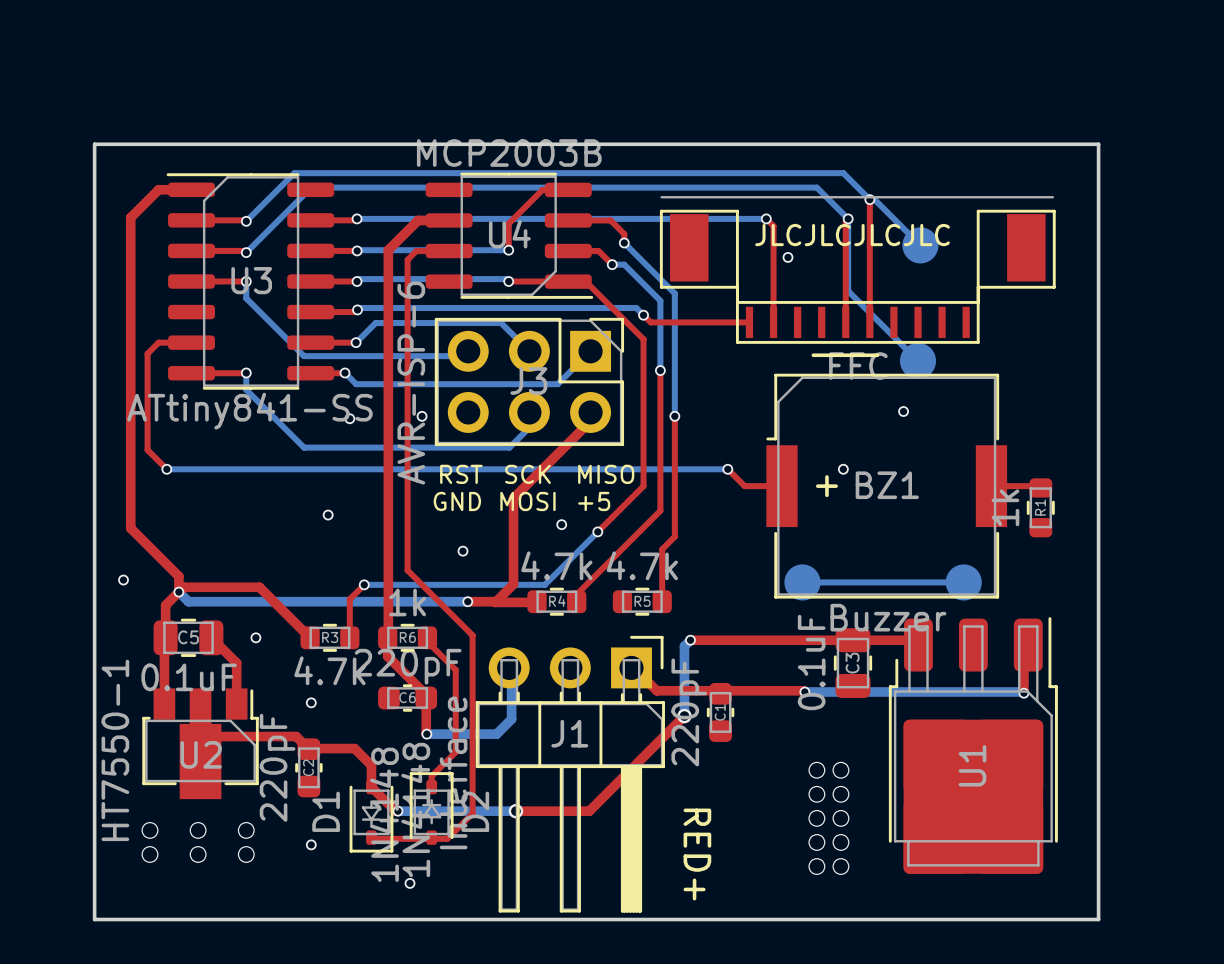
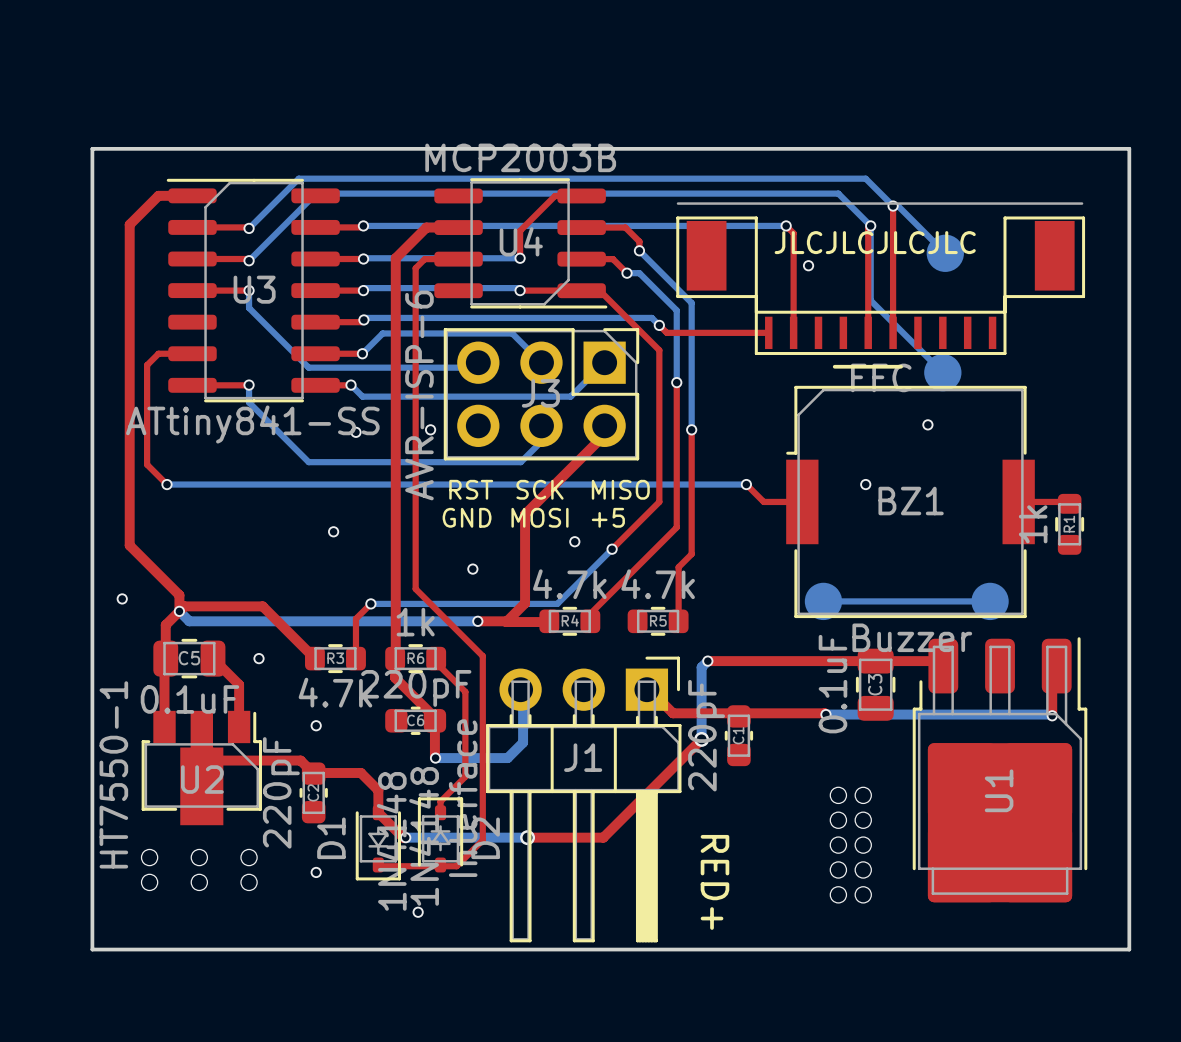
text: + (826, 486) -> none

